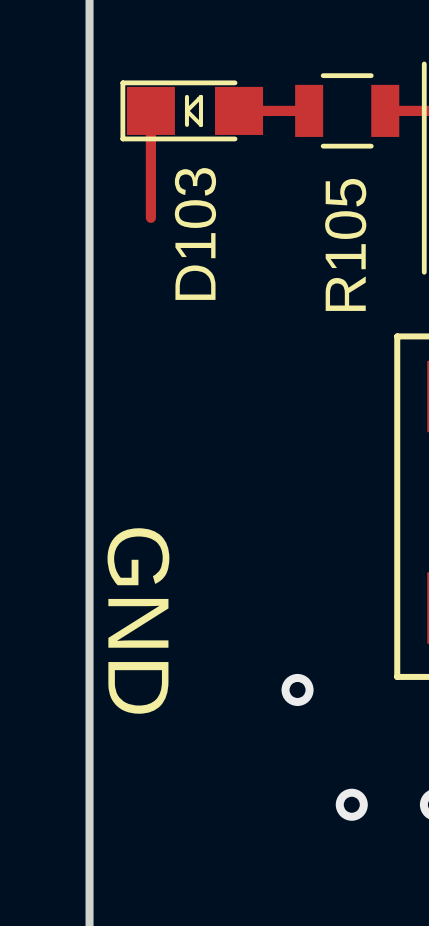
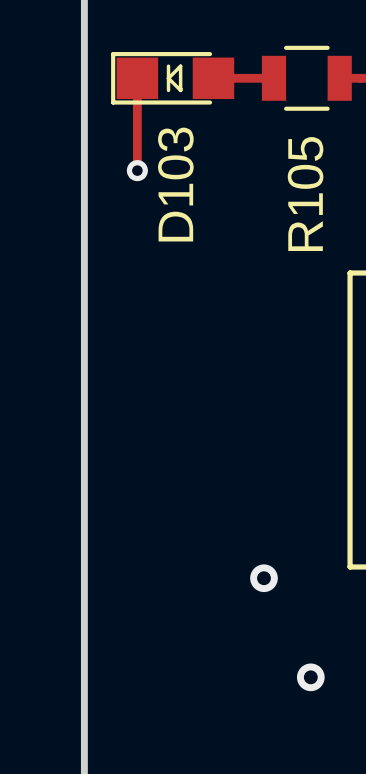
via: none -> (137, 170)
text: GND (138, 620) -> none

